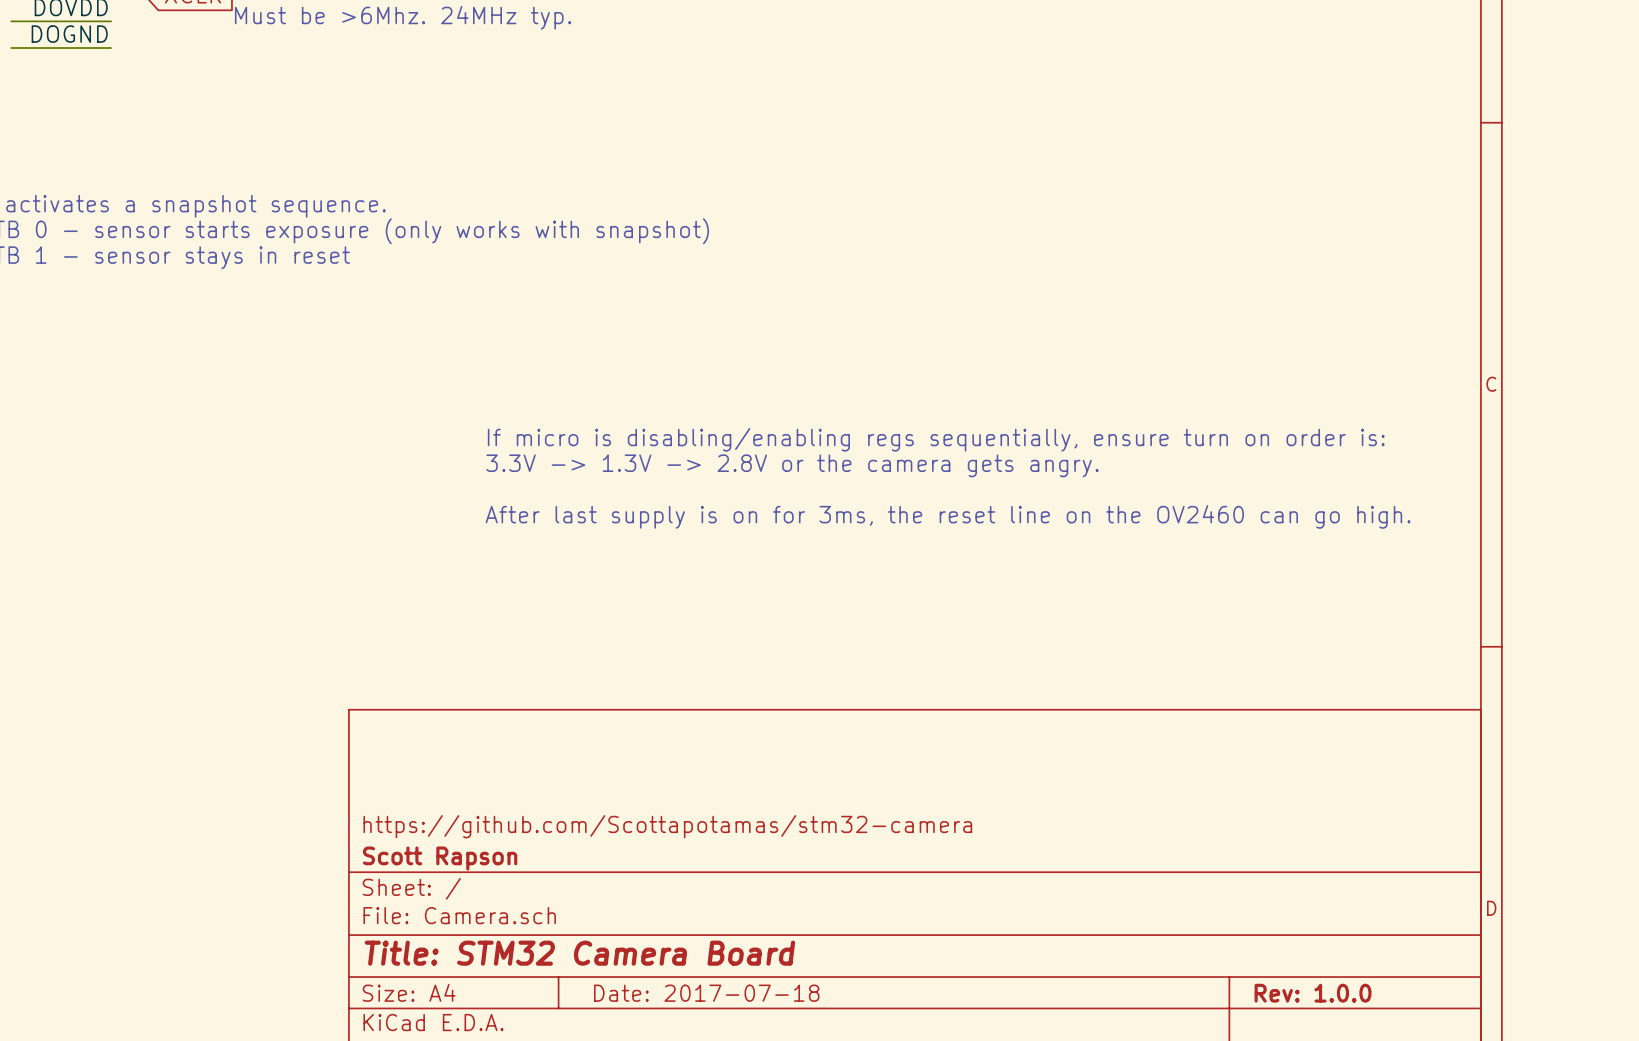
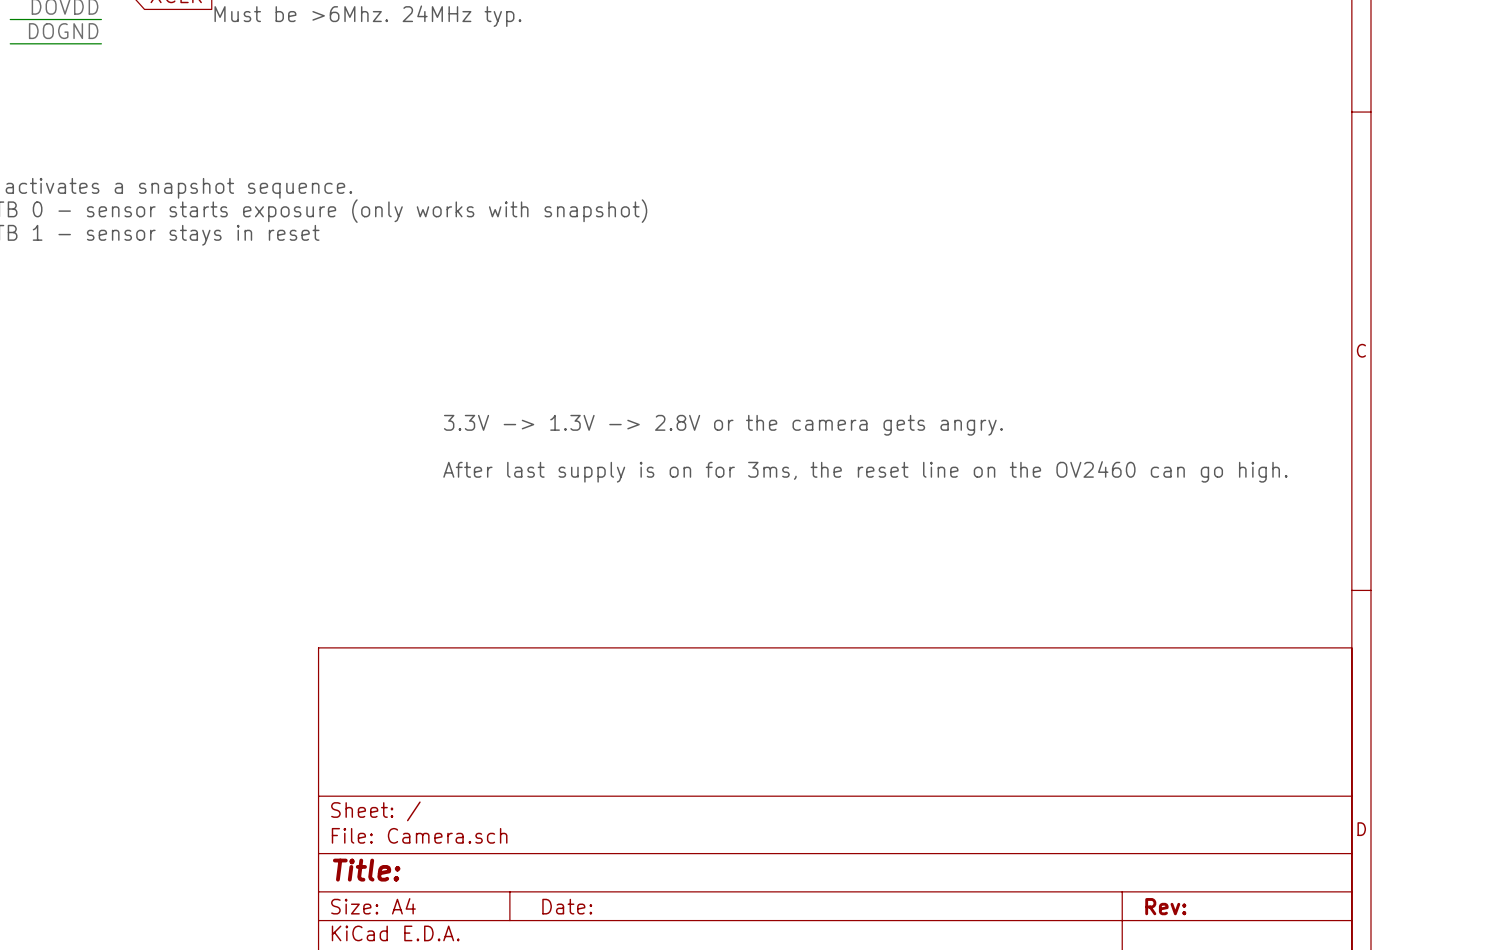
text: If micro is disabling/enabling regs sequentially, ensure turn on order is: (936, 439) -> none
title block: https://github.com/Scottapotamas/stm32-camera (667, 826) -> none
title block: Scott Rapson (440, 858) -> none
title block: Title: STM32 Camera Board (579, 953) -> Title: (366, 870)
title block: Date: 2017-07-18 (706, 993) -> Date: (567, 906)
title block: Rev: 1.0.0 (1313, 993) -> Rev: (1165, 906)

